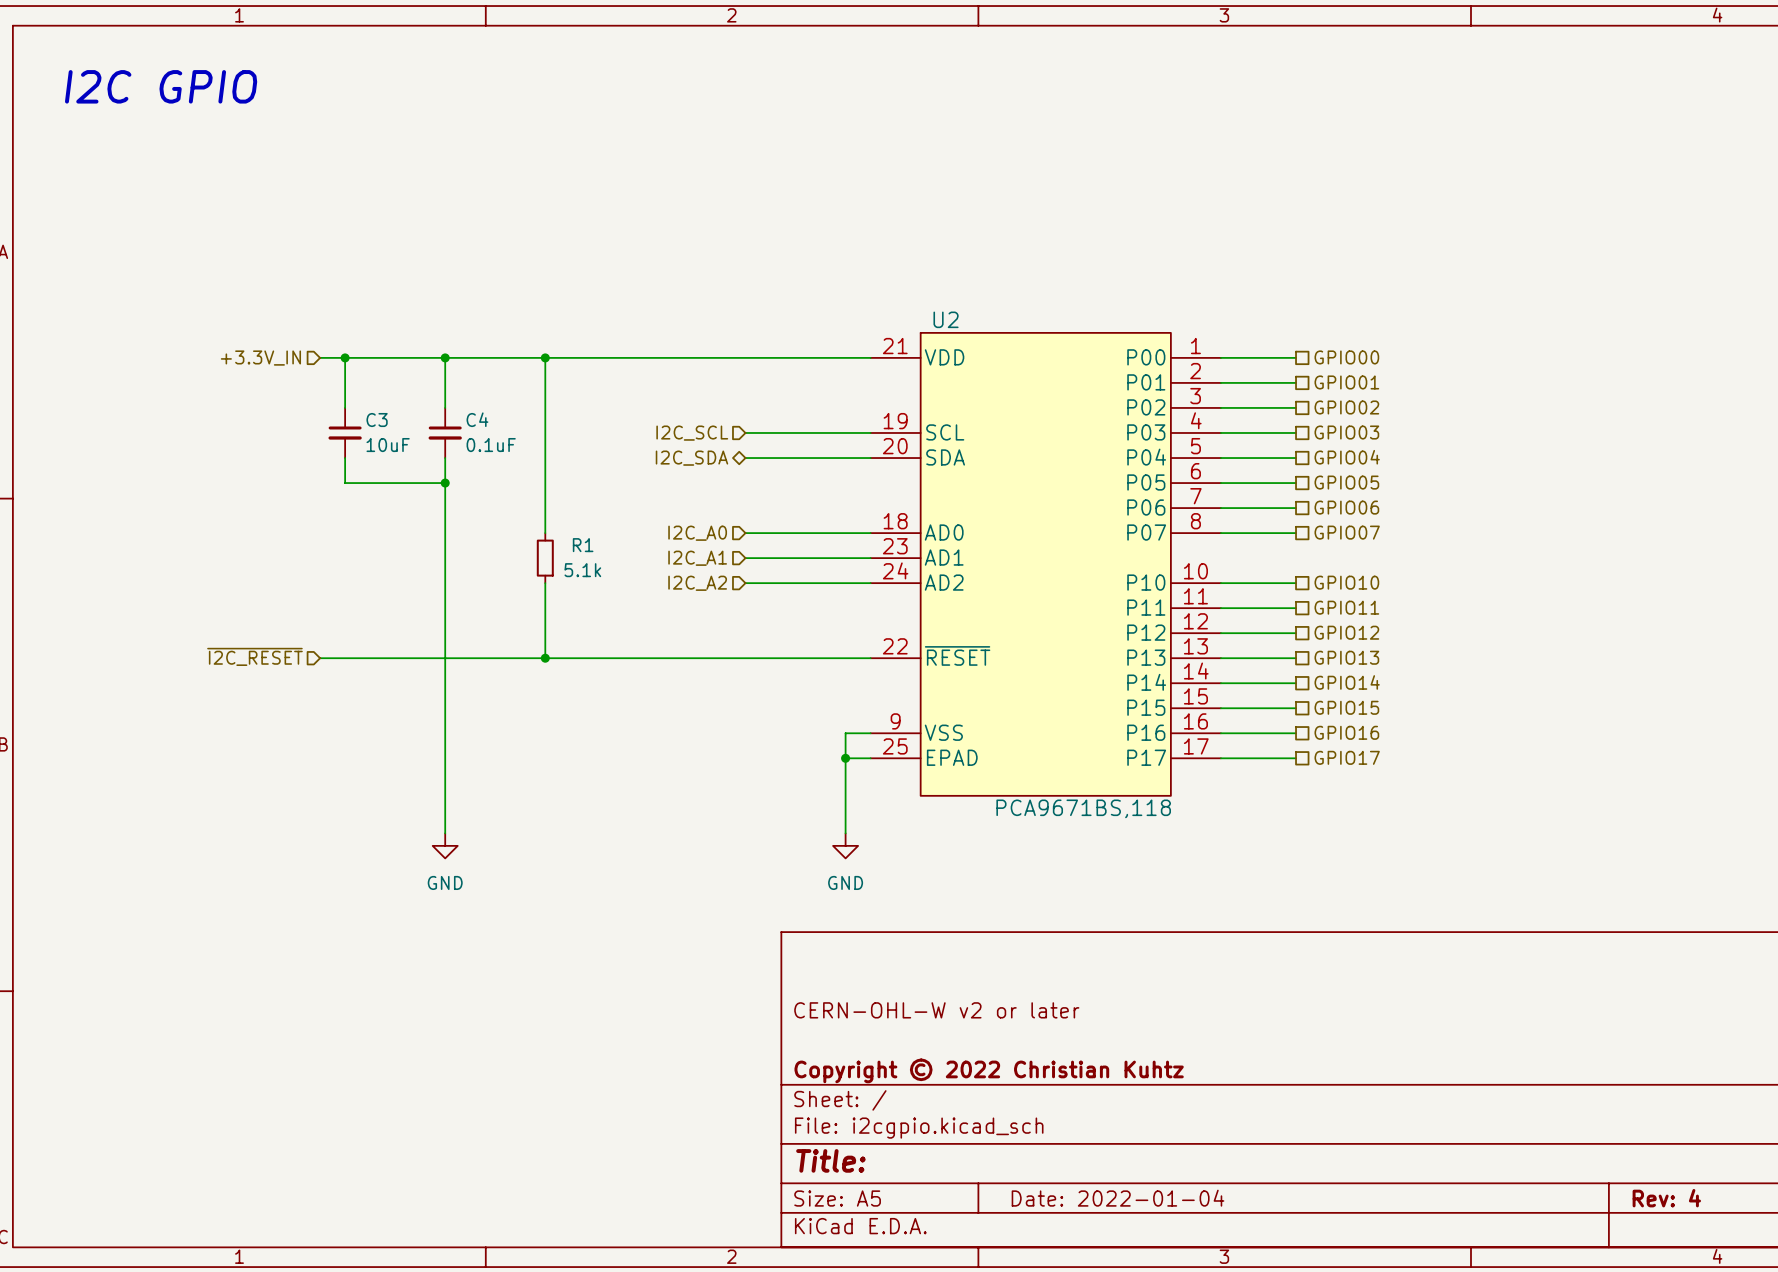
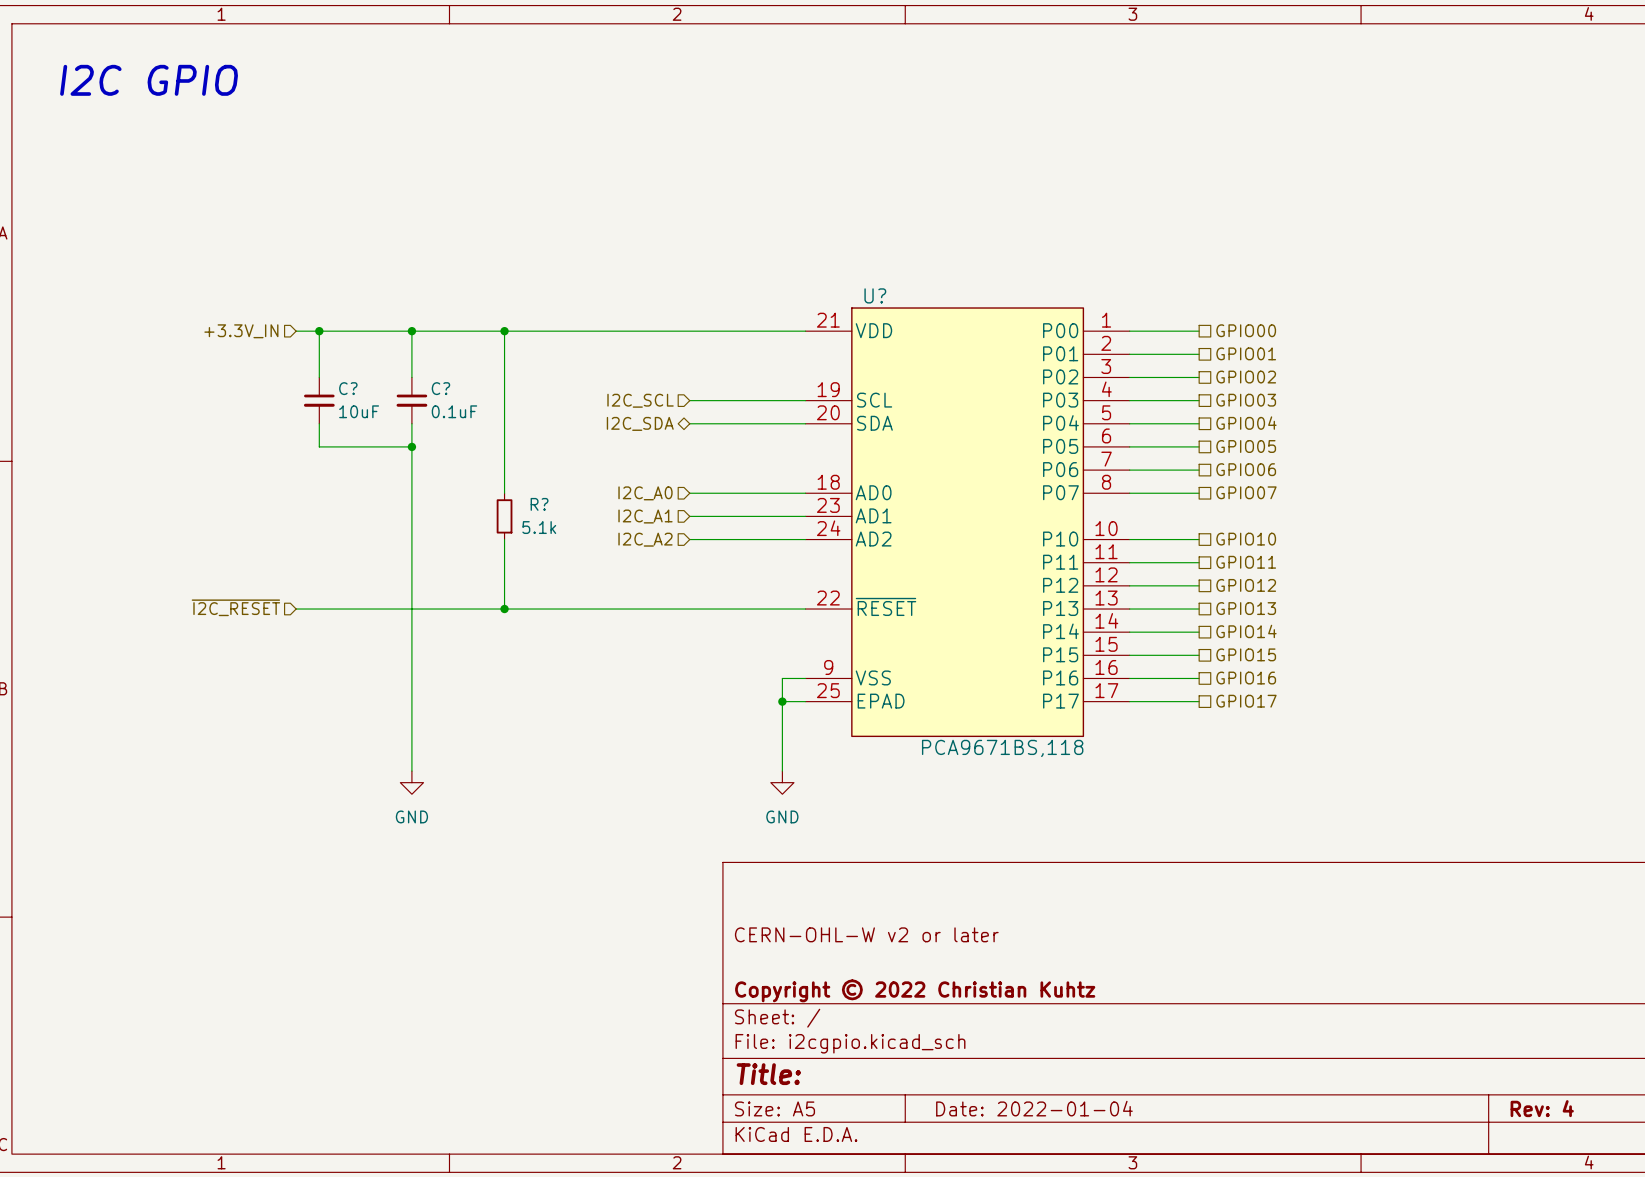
U2 name: U2 (946, 319) -> U? (875, 295)
C4 name: C4 (477, 419) -> C? (440, 388)
C3 name: C3 (377, 420) -> C? (348, 388)
R1 name: R1 (583, 545) -> R? (539, 504)

